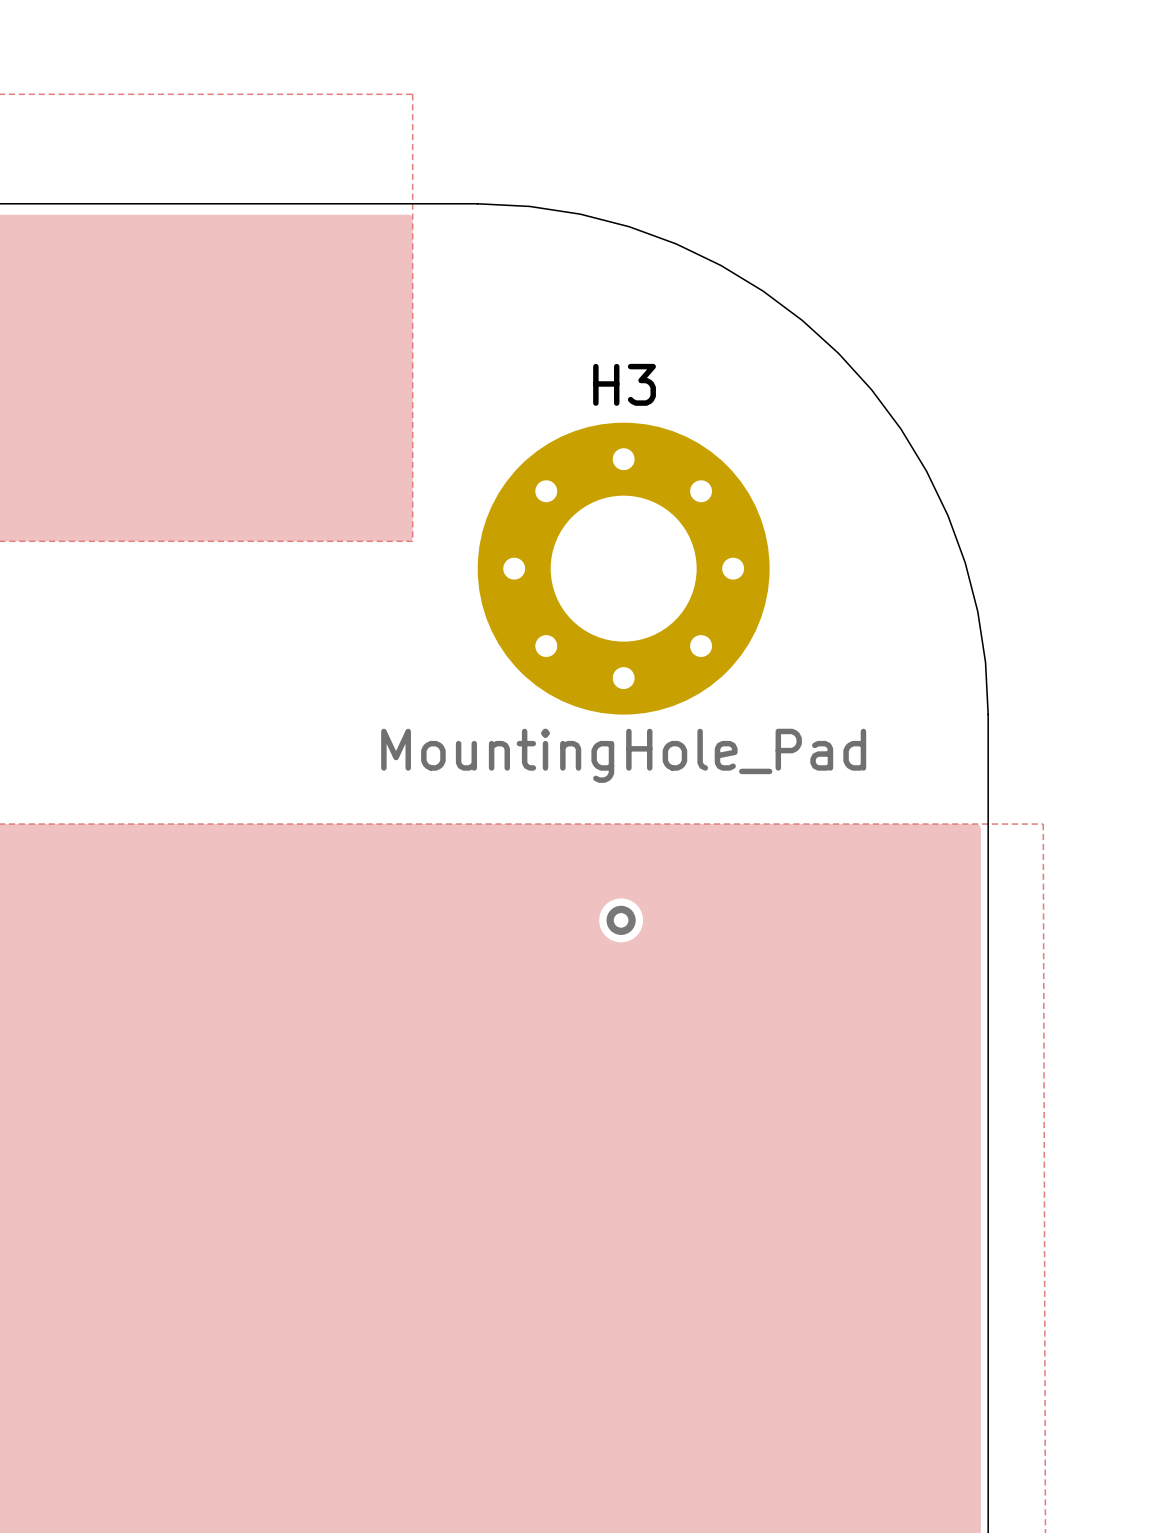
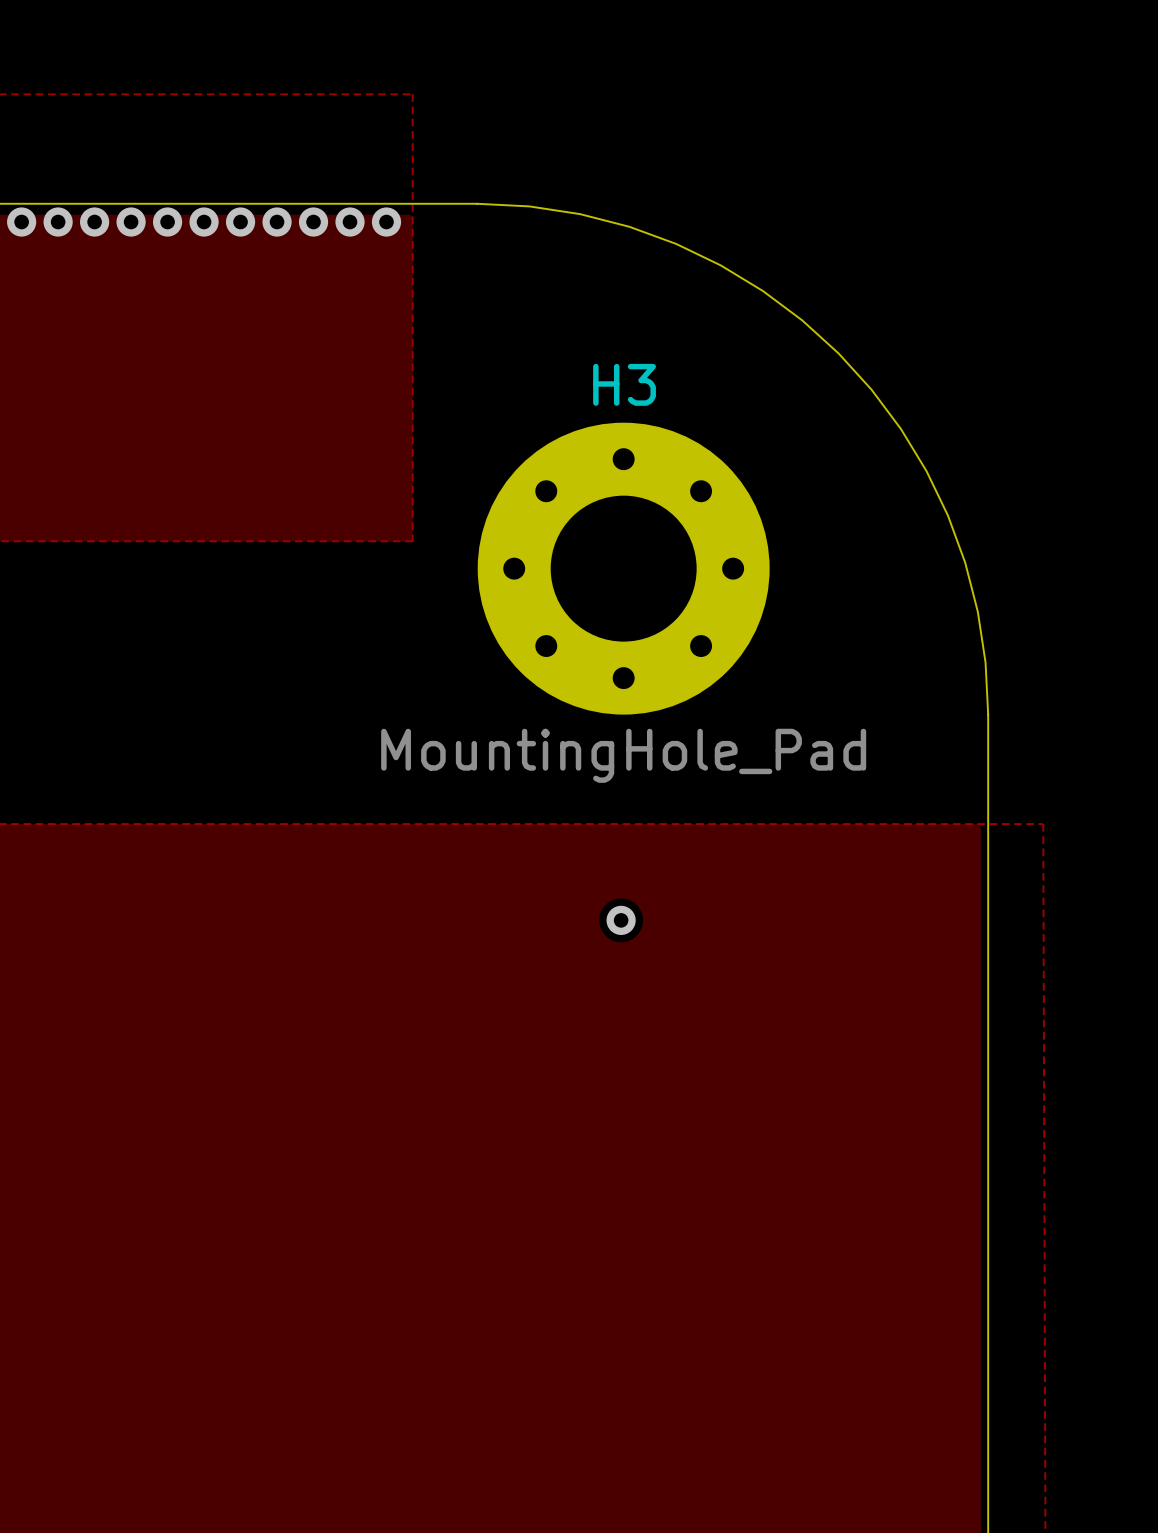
via: none -> (21, 222)
via: none -> (58, 222)
via: none -> (94, 222)
via: none -> (131, 222)
via: none -> (167, 222)
via: none -> (204, 222)
via: none -> (240, 222)
via: none -> (277, 222)
via: none -> (313, 222)
via: none -> (350, 222)
via: none -> (386, 222)

